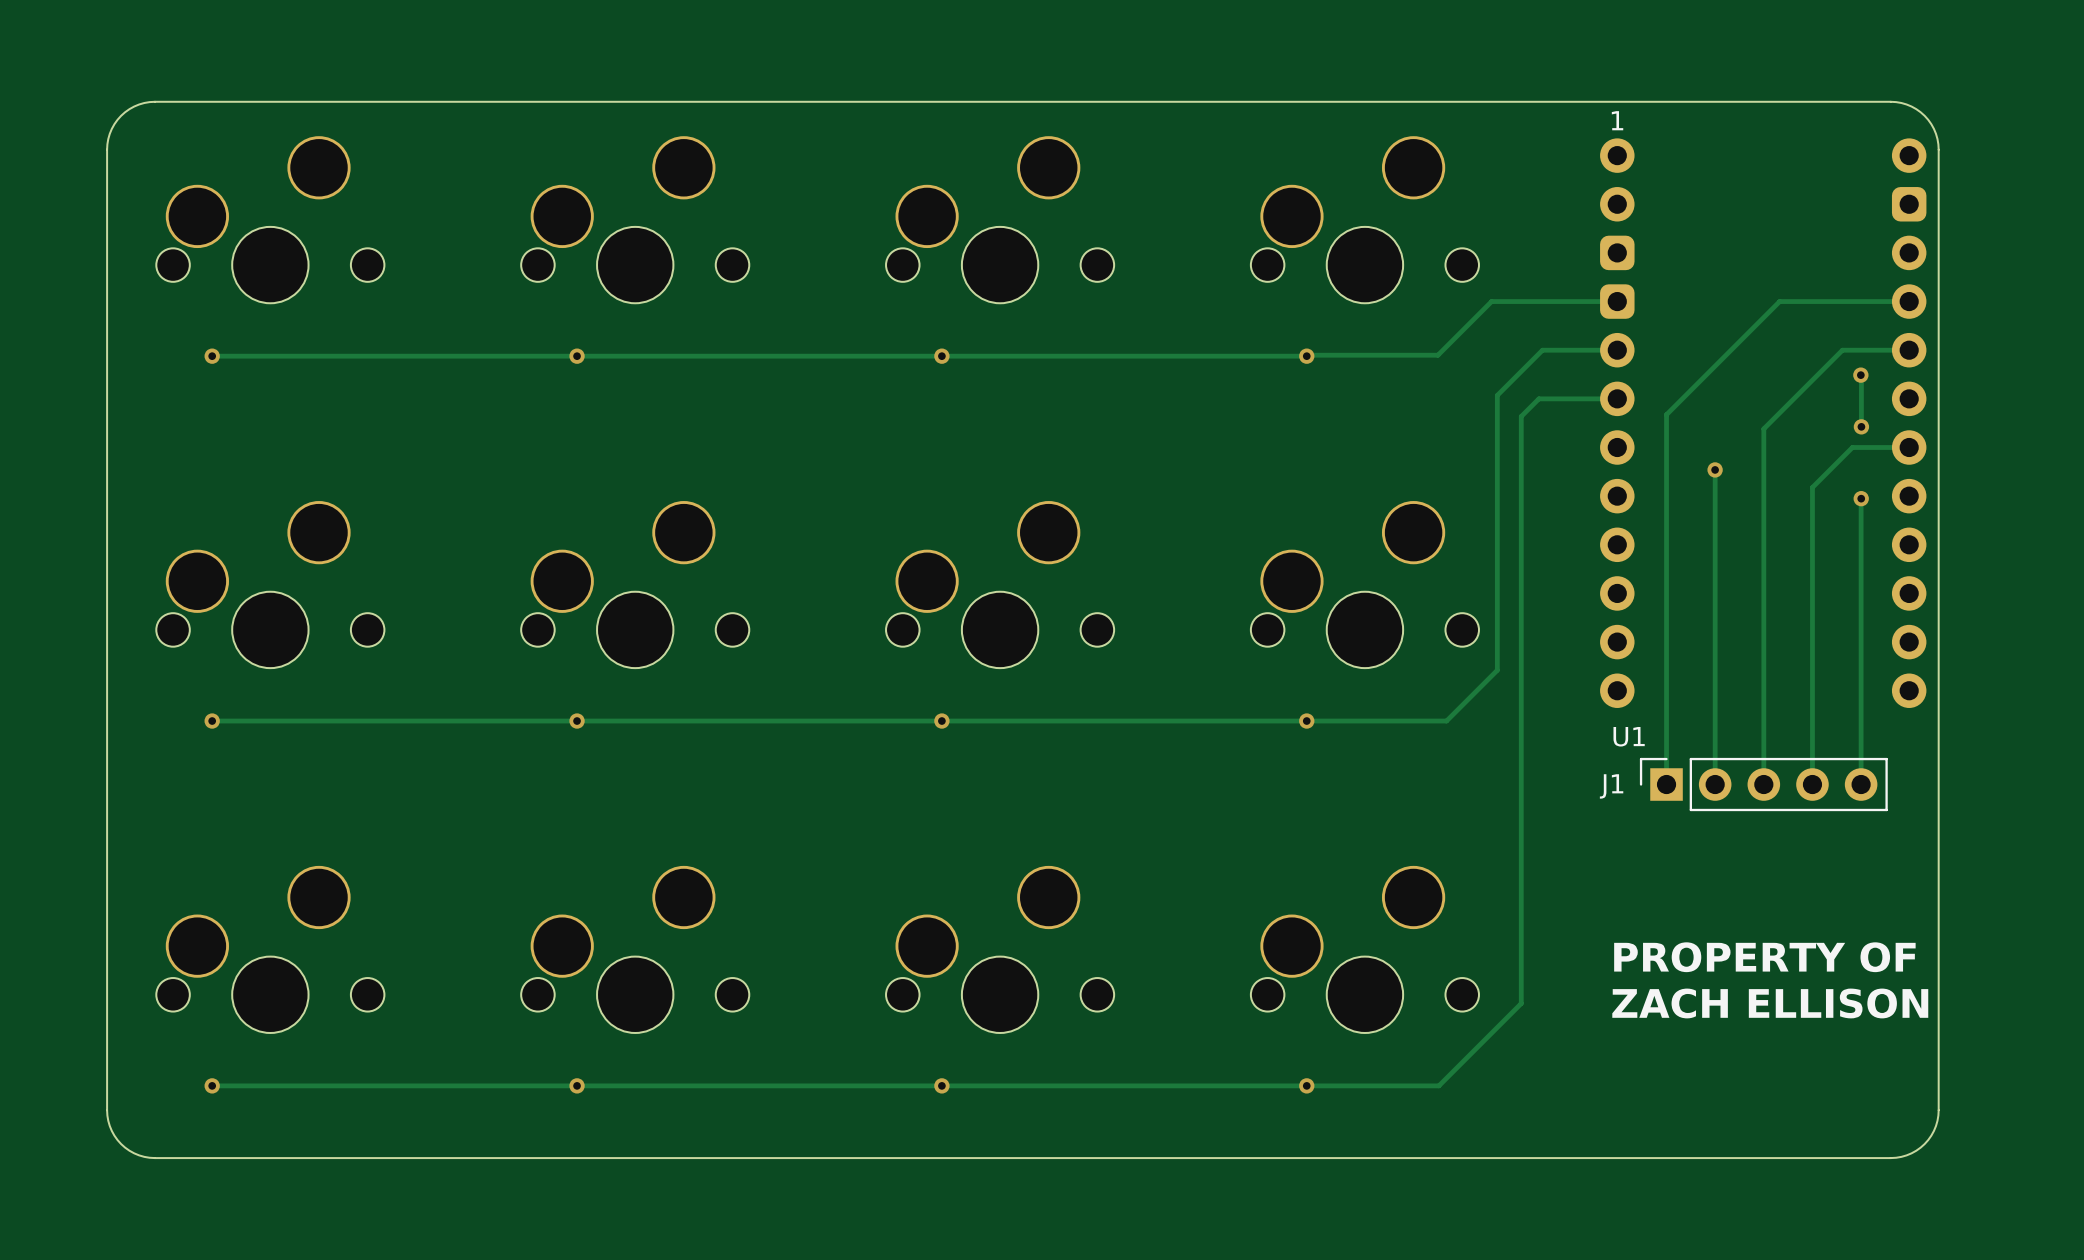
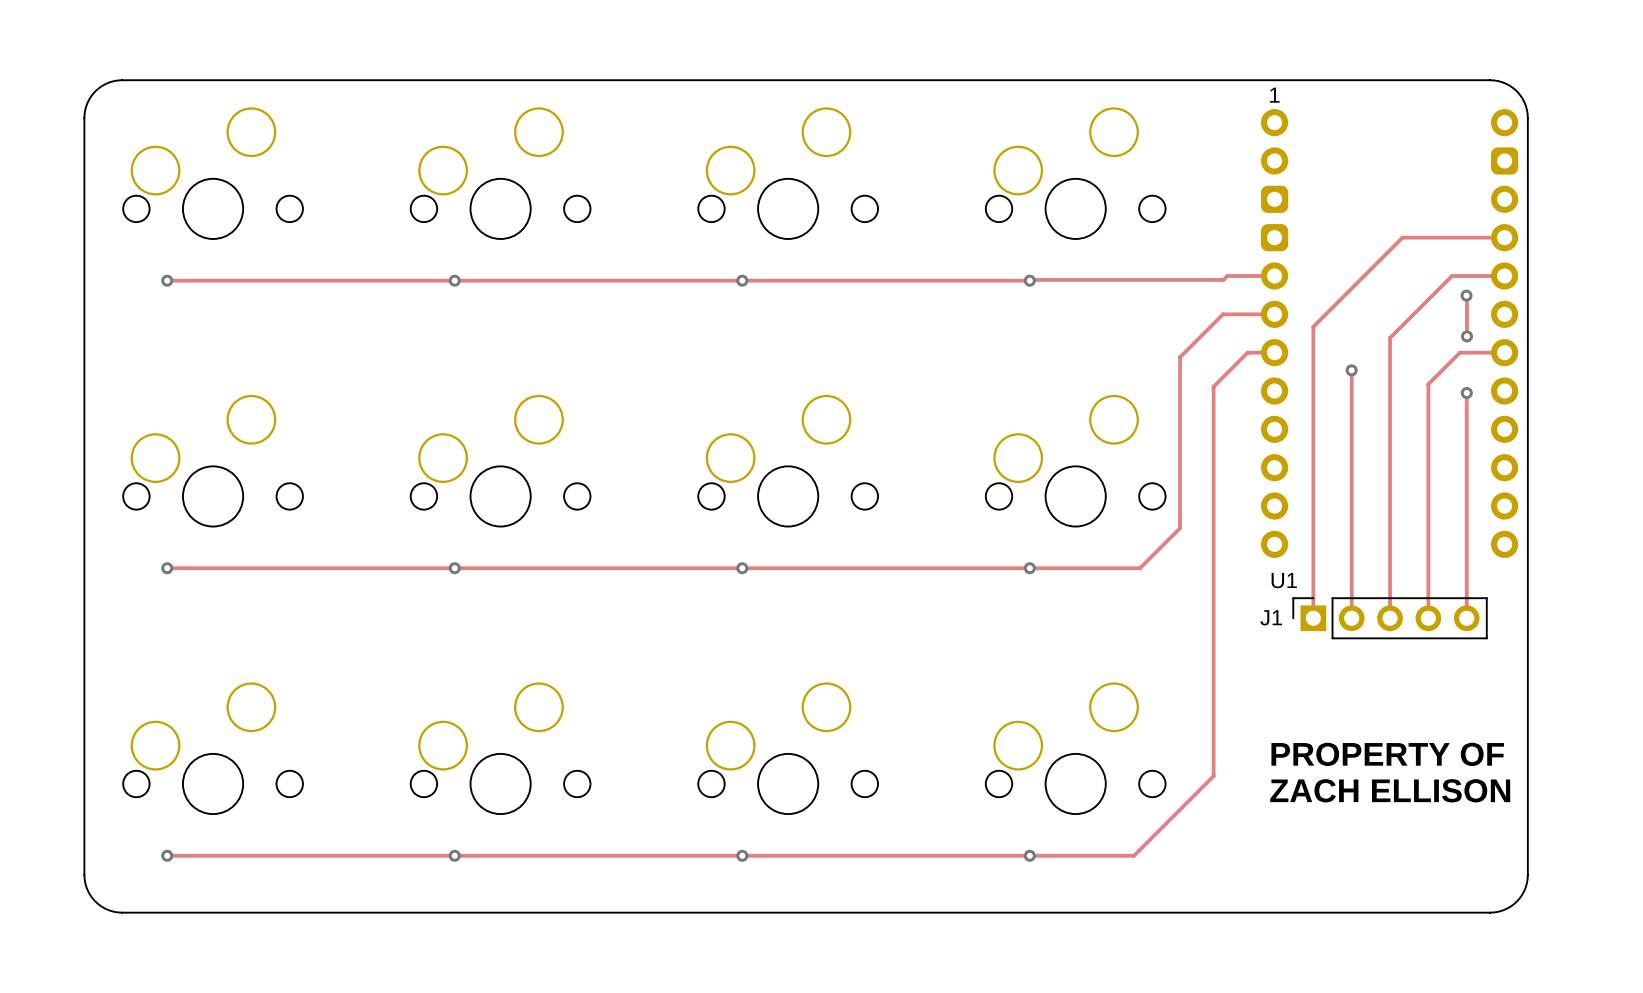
track: (1617, 301) (1491, 301) (1437, 355) -> (1227, 275) (1223, 279) (1133, 279)
track: (1557, 350) (1542, 350) (1497, 395) (1497, 453) -> (1222, 314) (1180, 357)
track: (1551, 398) (1538, 398) (1521, 416) (1521, 1003) -> (1274, 352) (1247, 352) (1213, 386) (1213, 776) (1198, 790)

